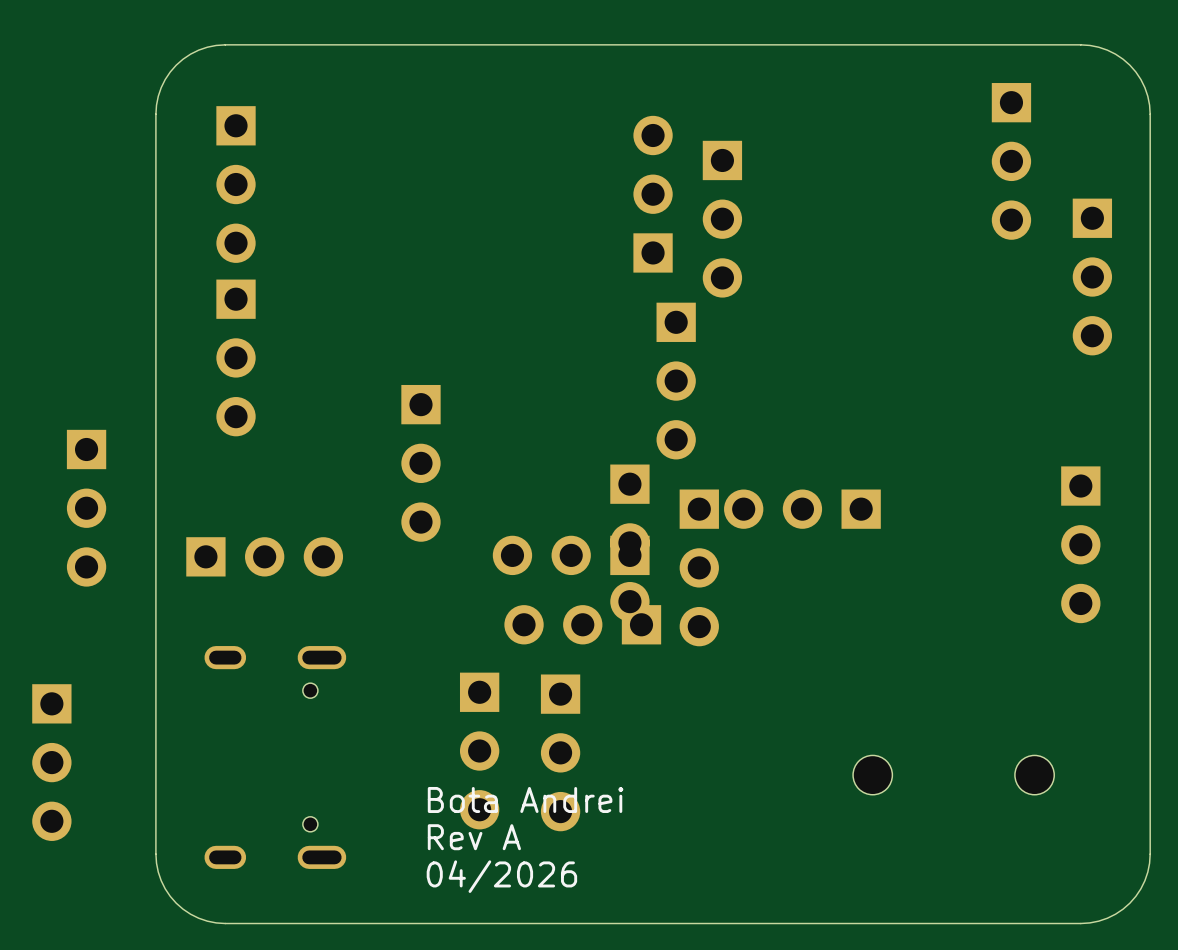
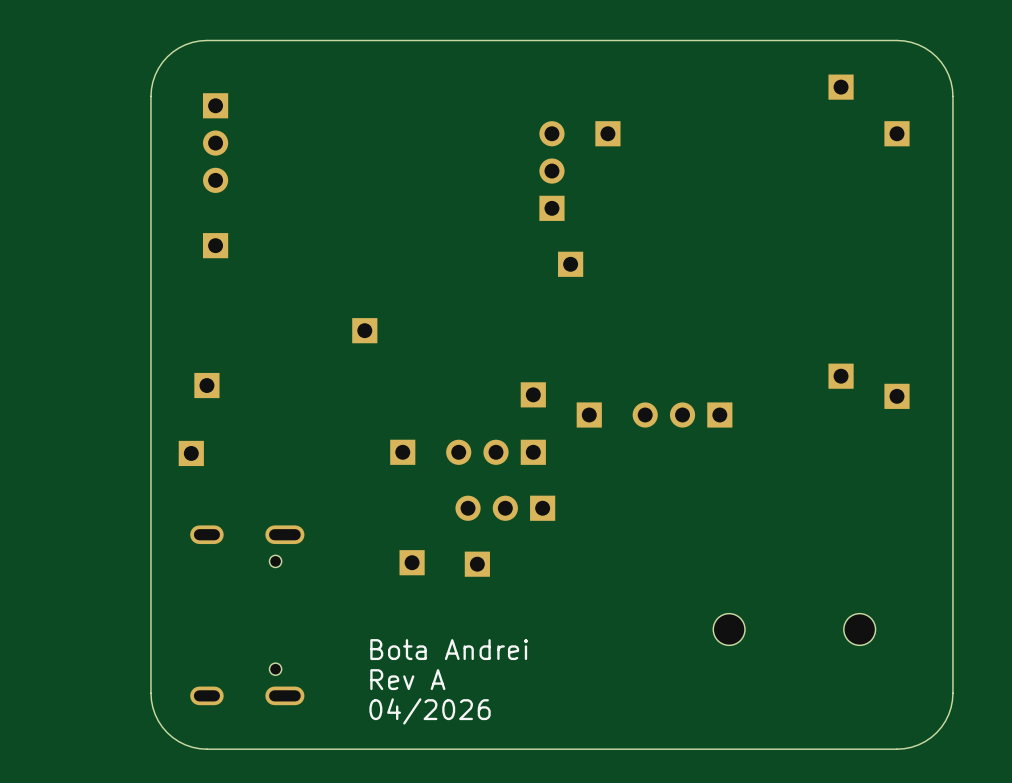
part: none -> (841, 87)
part footprint: [216, 106, 256, 263] -> [202, 93, 229, 193]
part footprint: [633, 115, 673, 273] -> [539, 121, 565, 221]
part: none -> (607, 133)
part: none -> (897, 133)
part: (1011, 161) -> none
part: (722, 219) -> none
part: (1092, 277) -> none
part: none -> (215, 245)
part: none -> (570, 264)
part: (236, 357) -> none
part: (676, 381) -> none
part: none -> (364, 330)
part: none -> (841, 376)
part: (420, 463) -> none
part: none -> (206, 385)
part: none -> (533, 394)
part: none -> (897, 396)
part footprint: [724, 489, 881, 529] -> [632, 402, 733, 428]
part: (86, 508) -> none
part: none -> (589, 414)
part footprint: [492, 535, 650, 576] -> [446, 439, 546, 465]
part: (629, 542) -> none
part: (1080, 544) -> none
part: none -> (402, 452)
part: none -> (191, 453)
part: (264, 556) -> none
part: (699, 567) -> none
part footprint: [504, 605, 662, 645] -> [455, 495, 556, 521]
part: none -> (412, 562)
part: none -> (477, 564)
part: (479, 751) -> none
part: (560, 752) -> none
part: (51, 762) -> none

